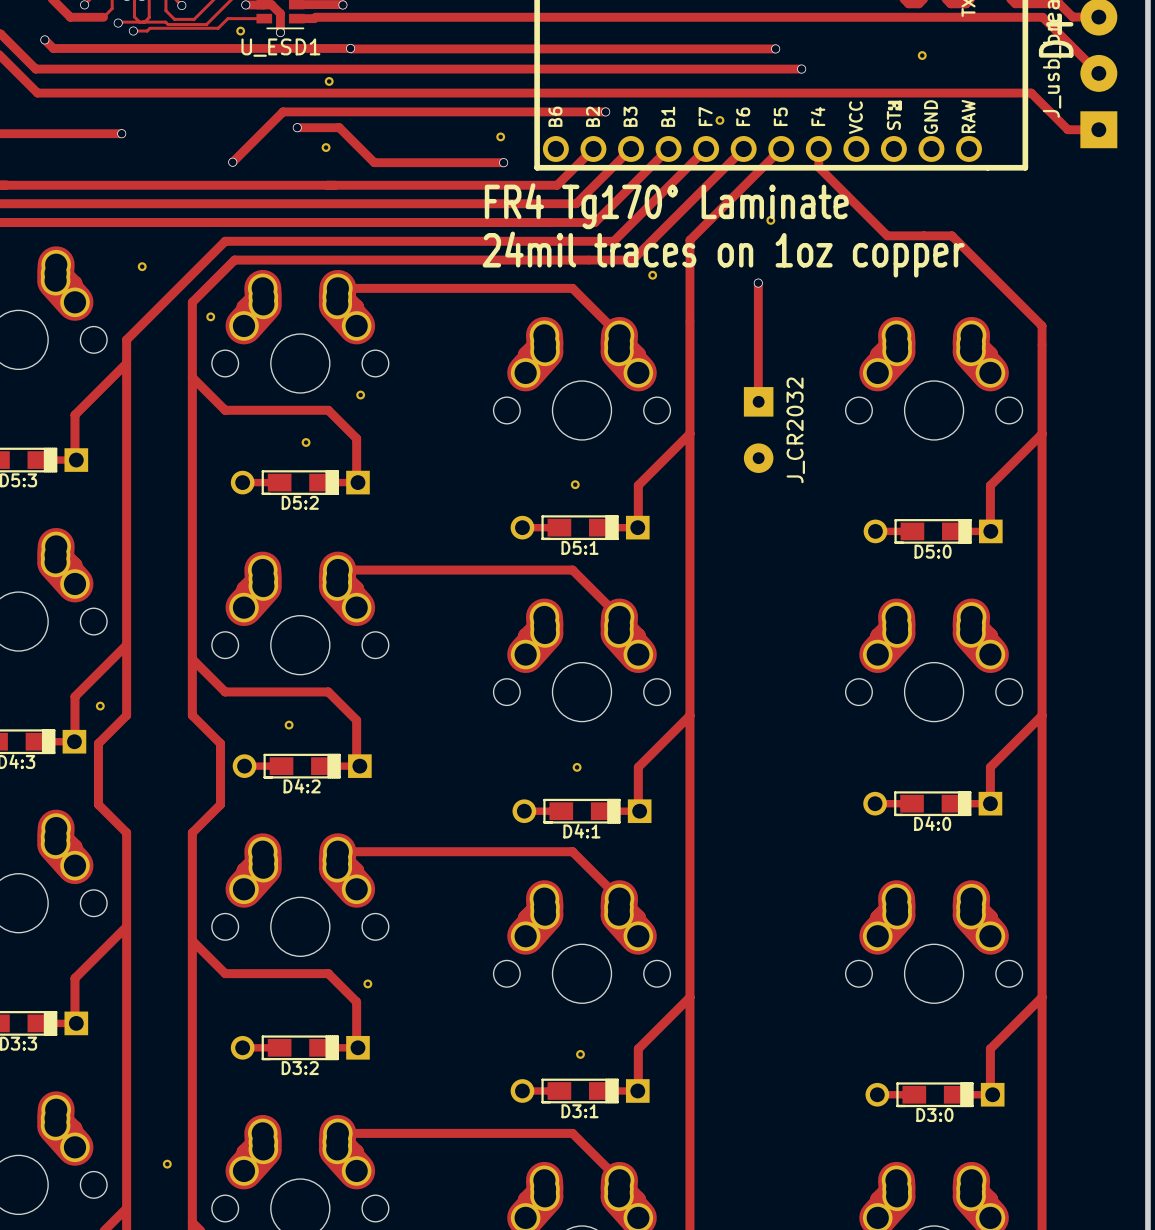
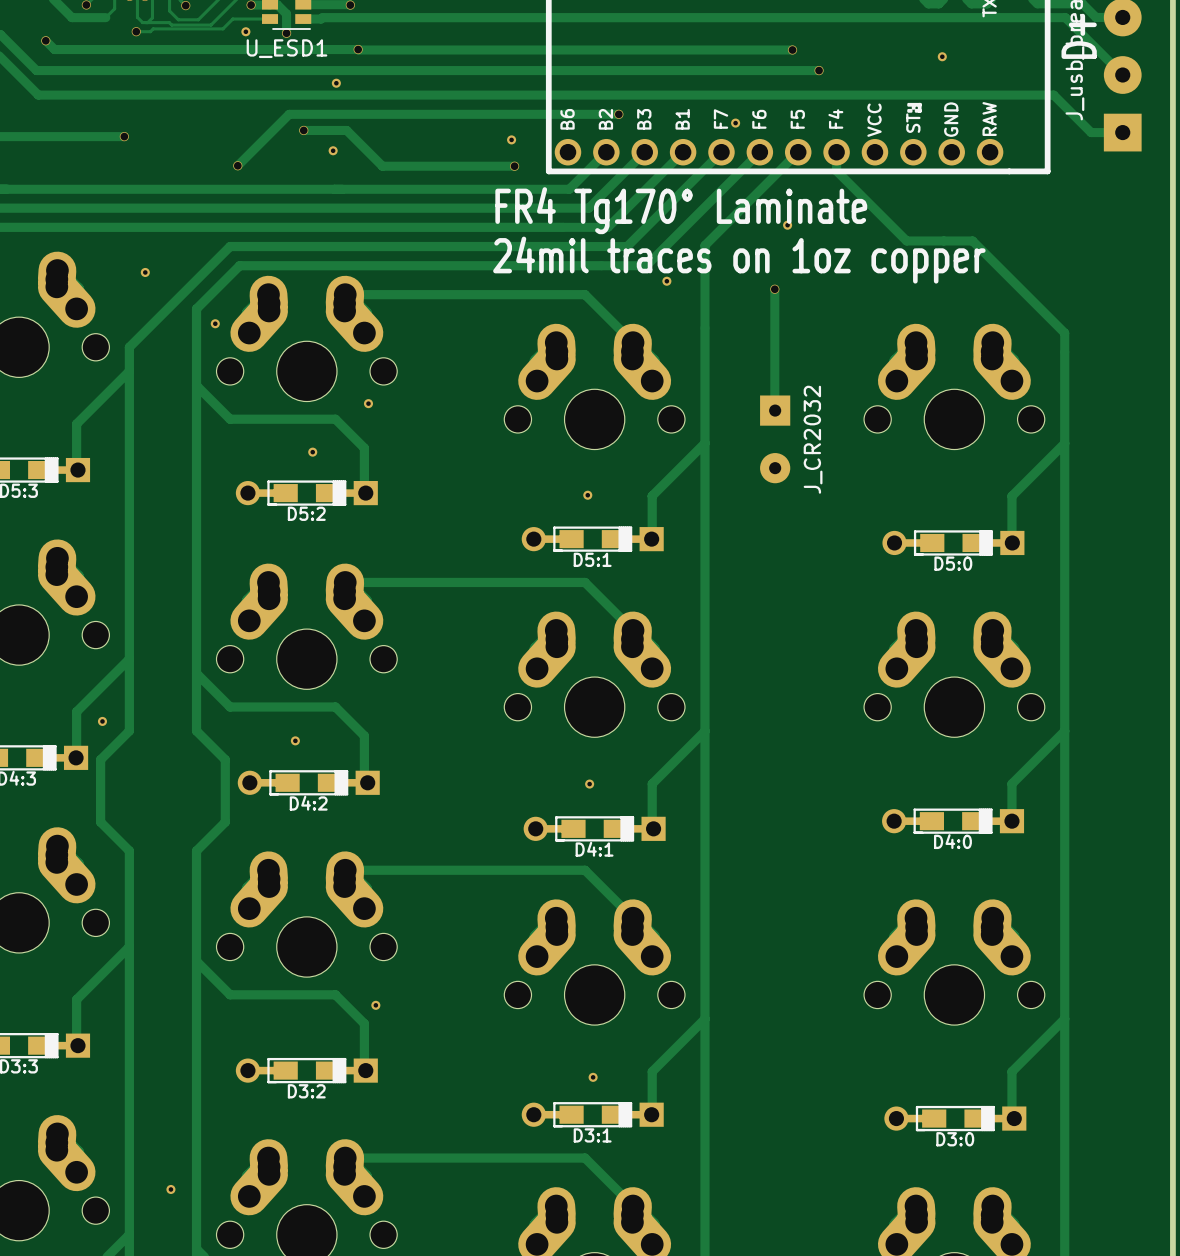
track: (139, 22) (118, 23) -> none
via: (118, 23) -> none

